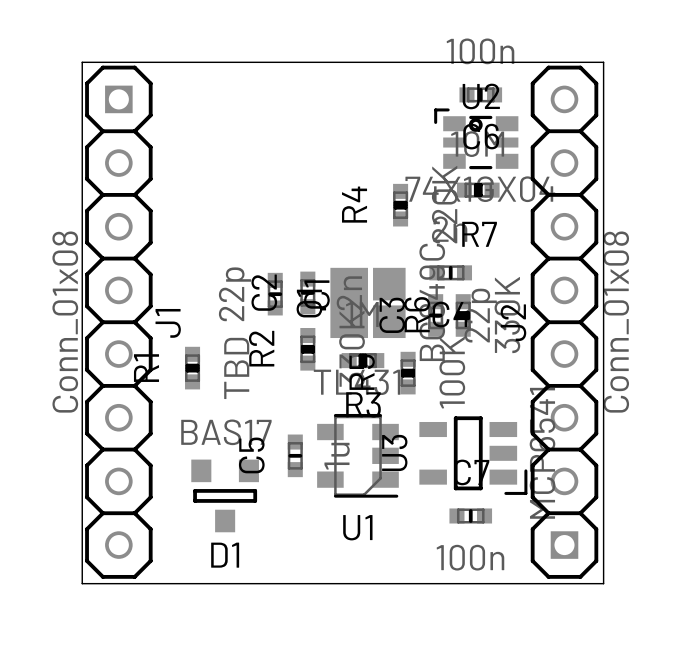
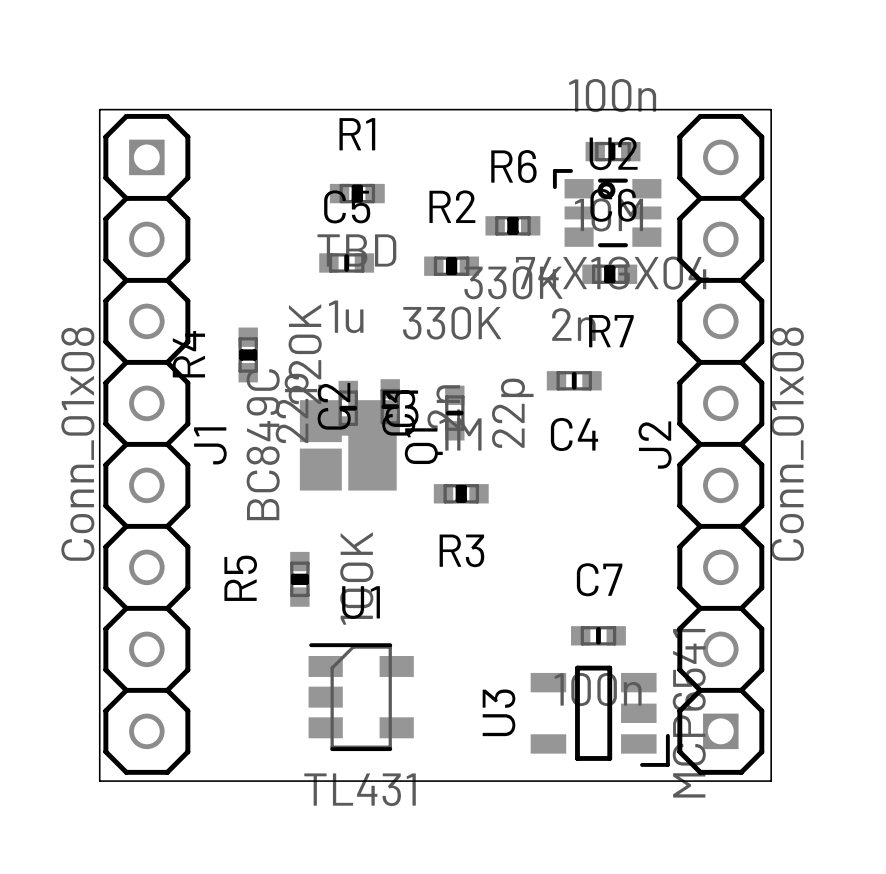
R4 position: (400, 205) -> (248, 354)
Q1 rotation: 0° (367, 302) -> 180° (348, 445)
Q1 position: (367, 302) -> (348, 445)
C3 position: (435, 315) -> (454, 413)
R6 rotation: 0° (463, 315) -> 90° clockwise (512, 225)
R6 position: (463, 315) -> (512, 225)
R2 rotation: 0° (307, 349) -> 90° clockwise (451, 266)
R2 position: (307, 349) -> (451, 266)
R1 rotation: 0° (192, 368) -> 90° clockwise (357, 193)
R1 position: (192, 368) -> (357, 193)
R5 position: (408, 373) -> (299, 579)
C5 rotation: 0° (295, 455) -> 90° clockwise (346, 262)
C5 position: (295, 455) -> (346, 262)
U1 rotation: 0° (357, 455) -> 180° (361, 697)
U1 position: (357, 455) -> (361, 697)
U3 position: (473, 455) -> (600, 716)
D1: BAS17 (225, 495) -> none
C7 position: (470, 515) -> (598, 635)

